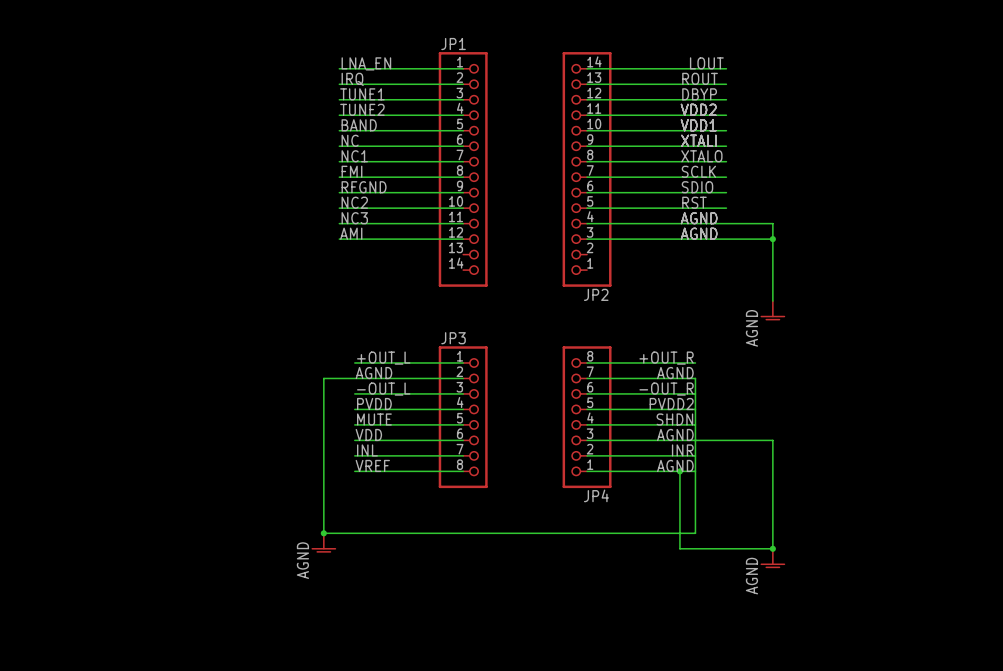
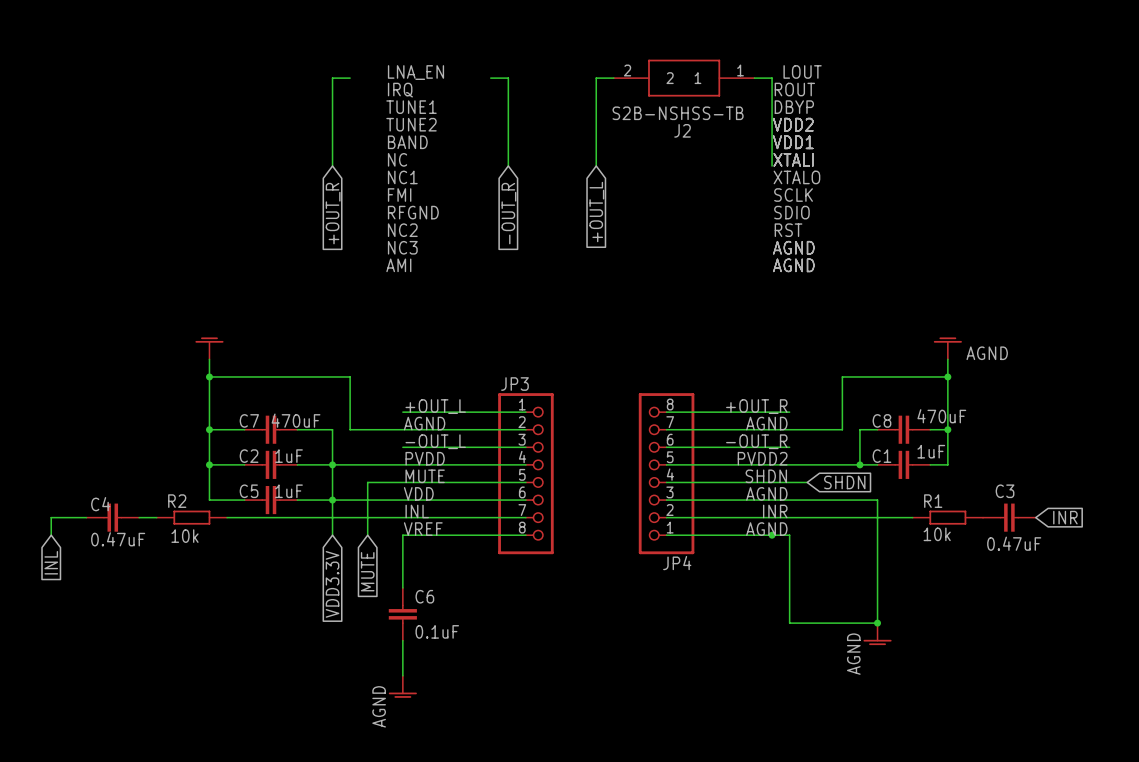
wire: none -> (350, 78) (332, 78) (332, 166)
wire: (339, 68) (432, 68) -> none
wire: (447, 68) (463, 68) -> (508, 78) (508, 166)
wire: none -> (613, 78) (596, 78) (596, 166)
wire: (587, 68) (664, 68) -> none
J2: none -> S2B-NSHSS-TB (684, 78)
wire: (679, 68) (726, 68) -> (772, 78) (772, 166)
wire: (339, 84) (463, 84) -> none
wire: (587, 84) (726, 84) -> none
wire: (339, 99) (463, 99) -> none
wire: (587, 99) (726, 99) -> none
wire: (339, 115) (463, 115) -> none
wire: (587, 115) (726, 115) -> none
wire: (339, 130) (463, 130) -> none
wire: (587, 130) (726, 130) -> none
wire: (339, 146) (463, 146) -> none
wire: (587, 146) (726, 146) -> none
wire: (339, 161) (463, 161) -> none
wire: (587, 161) (726, 161) -> none
JP1: (463, 169) -> none
JP2: (587, 169) -> none
wire: (339, 177) (463, 177) -> none
wire: (587, 177) (726, 177) -> none
global label: none -> +OUT_L (596, 212)
global label: none -> +OUT_R (333, 213)
global label: none -> -OUT_R (508, 213)
wire: (339, 192) (463, 192) -> none
wire: (587, 192) (726, 192) -> none
wire: (339, 208) (463, 208) -> none
wire: (587, 208) (726, 208) -> none
wire: (339, 223) (463, 223) -> none
wire: (587, 223) (772, 223) (772, 301) -> none
wire: (339, 239) (463, 239) -> none
wire: (587, 239) (772, 239) -> none
junction: (772, 239) -> none
power symbol: none -> (209, 348)
power symbol position: AGND (772, 310) -> AGND (947, 348)
wire: none -> (209, 359) (209, 500) (244, 500)
wire: none -> (947, 359) (947, 464) (930, 464)
power symbol rotation: 0° (772, 318) -> 180° (947, 340)
power symbol text position: AGND (751, 328) -> AGND (987, 353)
wire: none -> (209, 376) (350, 376) (350, 429) (367, 429)
junction: none -> (209, 376)
junction: none -> (947, 376)
wire: none -> (209, 429) (244, 429)
junction: none -> (209, 429)
C7: none -> 470uF (271, 429)
wire: none -> (297, 429) (332, 429) (332, 535)
wire: (323, 378) (323, 424) -> (402, 482) (367, 482)
wire: (695, 378) (695, 471) -> (789, 429) (842, 429) (842, 376) (947, 376)
wire: none -> (877, 429) (859, 429) (859, 464)
C8: none -> 470uF (903, 429)
wire: none -> (930, 429) (947, 429)
junction: none -> (947, 429)
wire: none -> (209, 464) (244, 464)
junction: none -> (209, 464)
C2: none -> 1uF (271, 464)
wire: none -> (297, 464) (402, 464)
junction: none -> (332, 464)
wire: none -> (789, 464) (877, 464)
junction: none -> (859, 464)
C1: none -> 1uF (903, 464)
wire: none -> (789, 482) (807, 482)
global label: none -> SHDN (844, 482)
C5: none -> 1uF (271, 500)
wire: none -> (297, 500) (402, 500)
junction: none -> (332, 500)
wire: none -> (86, 517) (51, 517) (51, 535)
C4: none -> 0.47uF (112, 517)
wire: none -> (139, 517) (156, 517)
R2: none -> 10k (191, 517)
wire: none -> (227, 517) (402, 517)
wire: none -> (789, 517) (912, 517)
R1: none -> 10k (947, 517)
C3: none -> 0.47uF (1009, 517)
global label: none -> INR (1065, 517)
wire: (323, 471) (323, 533) (695, 533) -> none
wire: none -> (402, 535) (402, 587)
wire: (679, 471) (679, 548) (695, 548) -> (789, 605) (789, 623)
global label: none -> INL (51, 562)
global label: none -> MUTE (367, 571)
global label: none -> VDD3.3V (332, 584)
junction: (323, 533) -> none
C6: none -> 0.1uF (402, 614)
power symbol position: AGND (323, 542) -> AGND (402, 686)
wire: none -> (402, 640) (402, 675)

